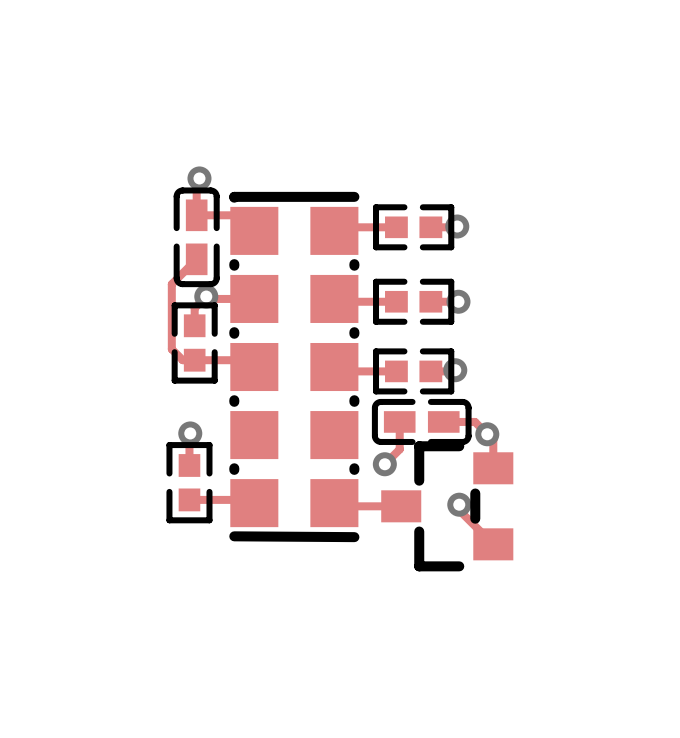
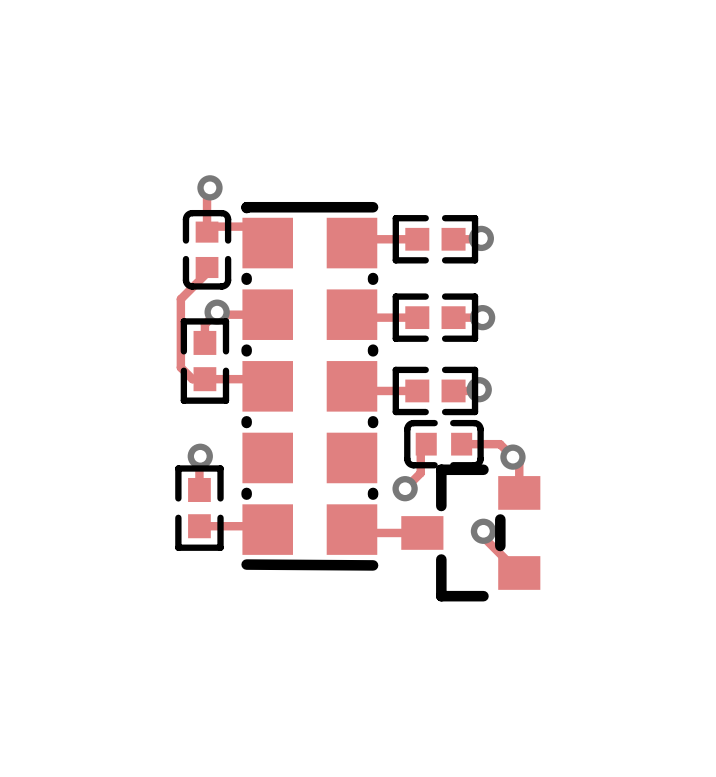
part footprint: [173, 187, 220, 288] -> [182, 209, 232, 290]
part footprint: [371, 398, 472, 445] -> [404, 419, 484, 469]

